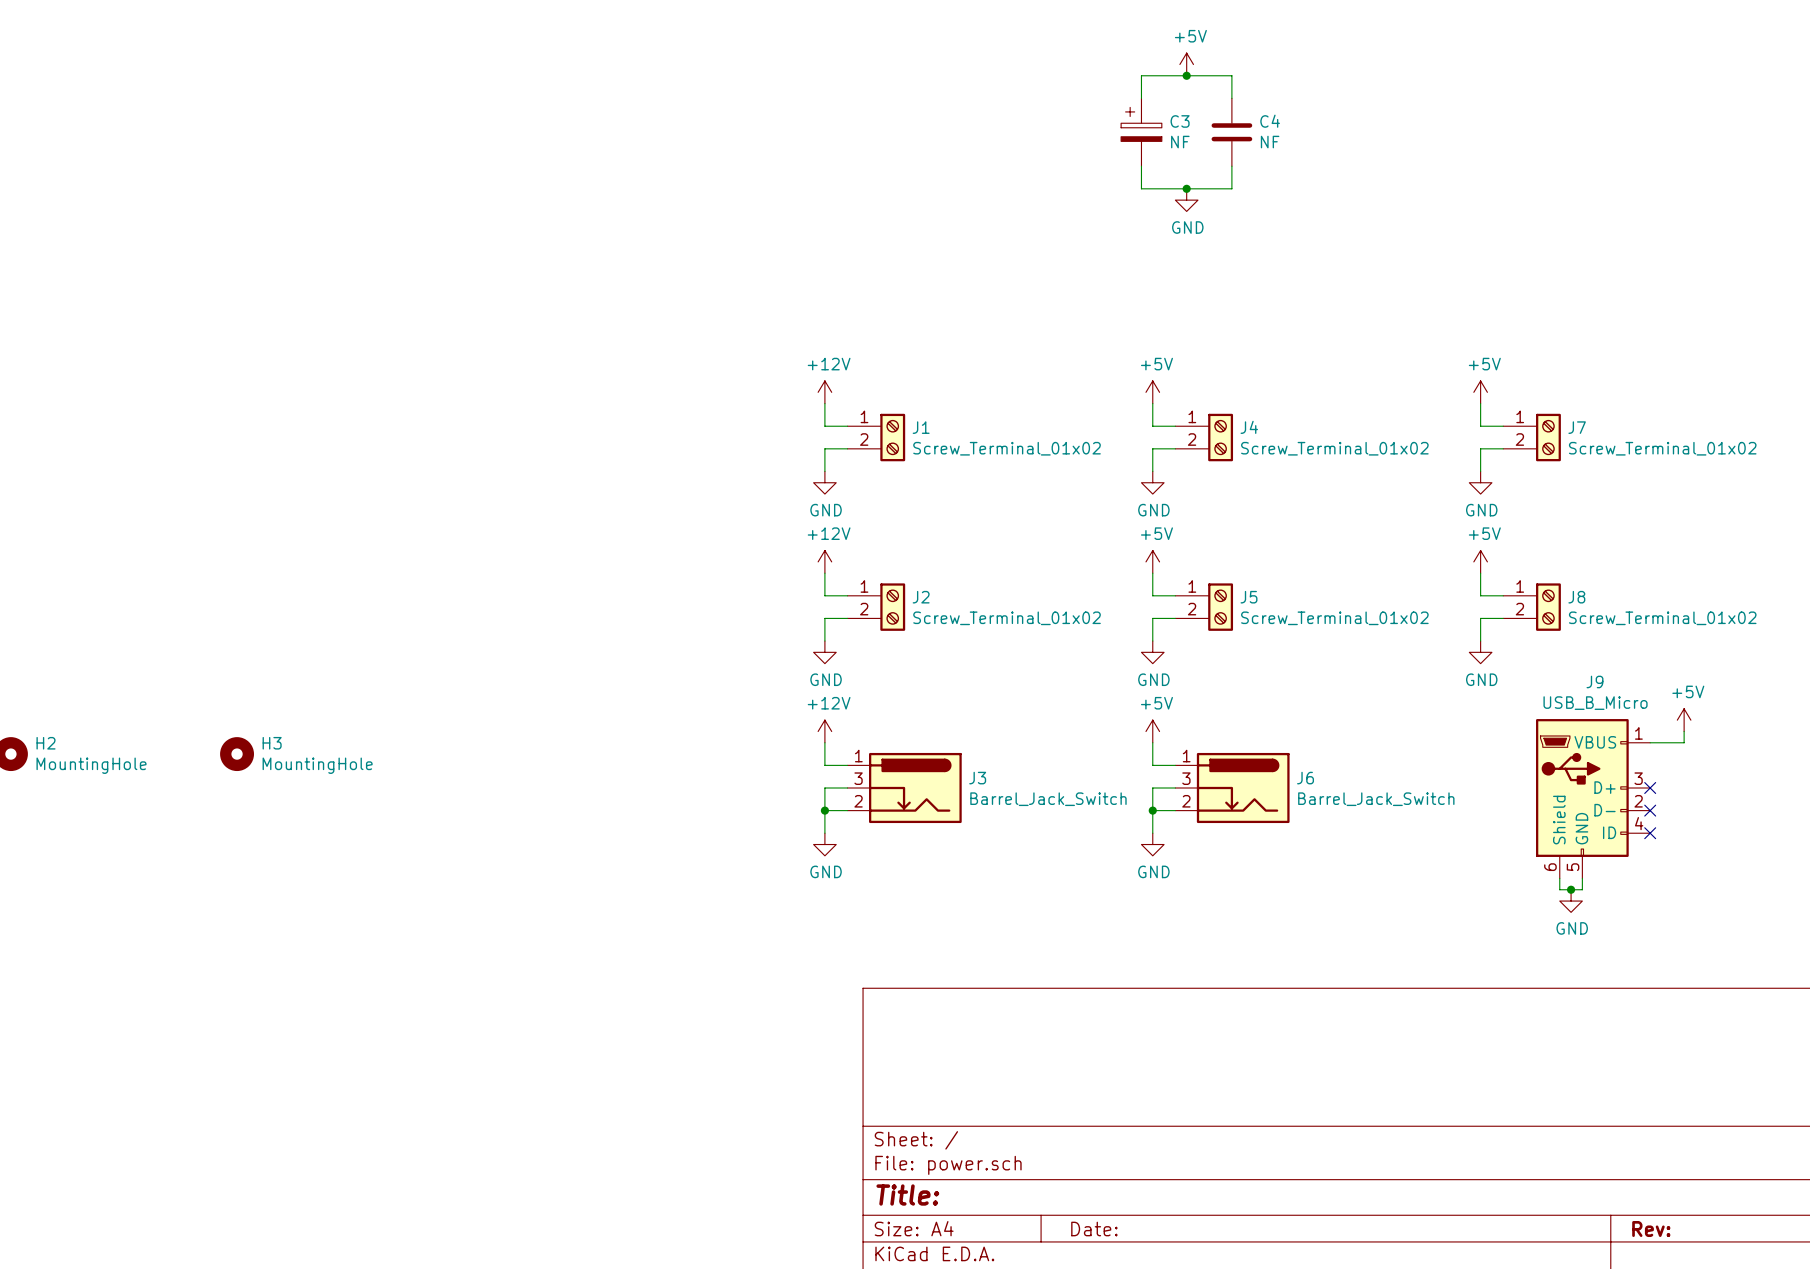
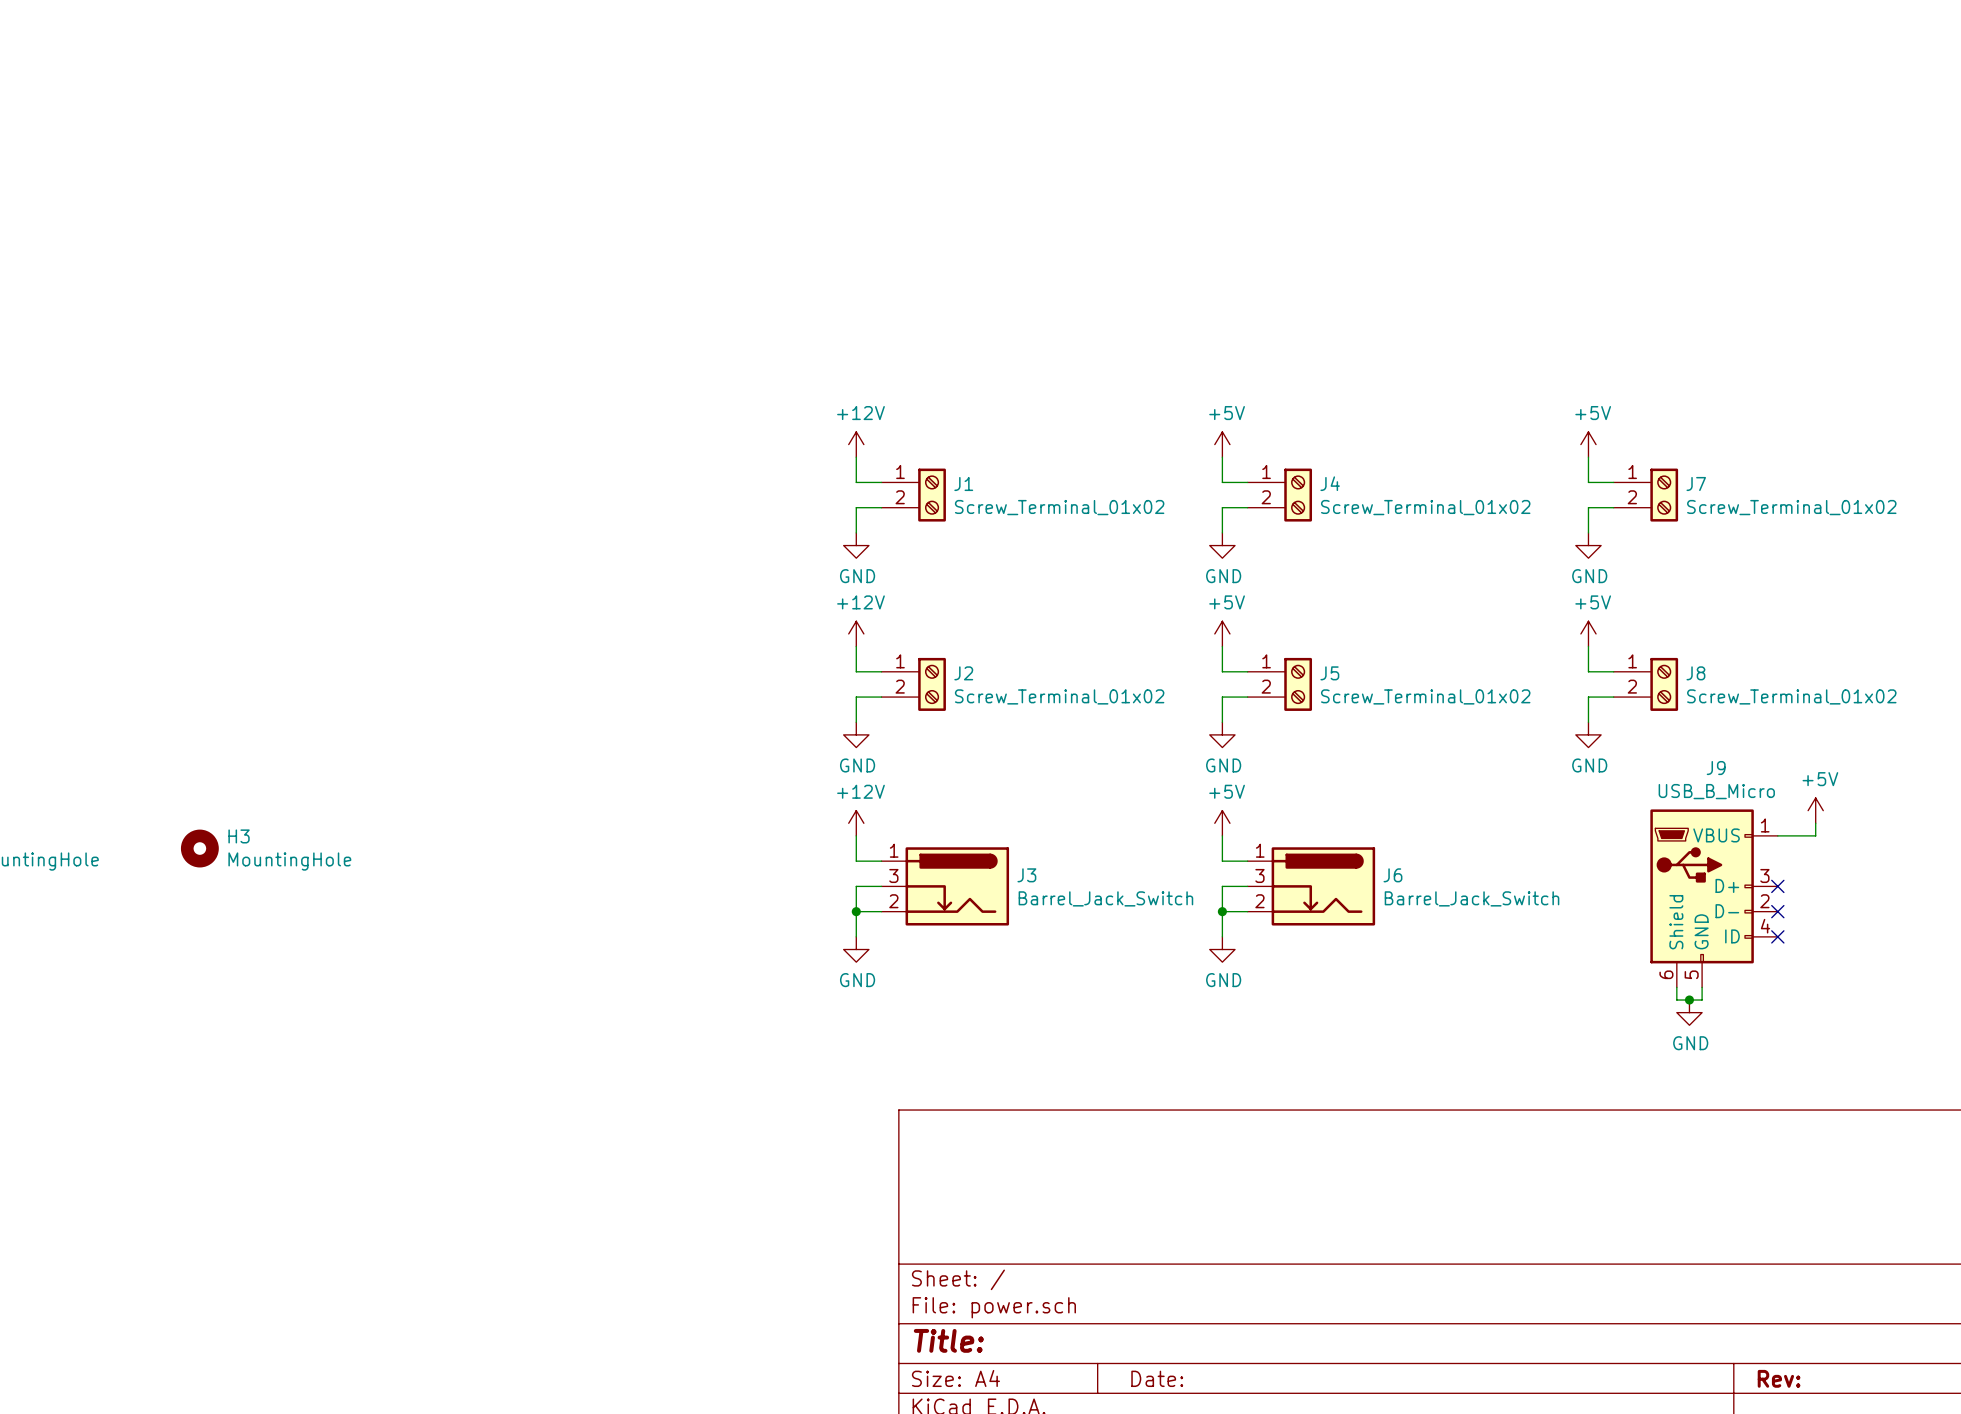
power symbol: +5V (1186, 64) -> none
junction: (1186, 75) -> none
wire: (1141, 98) (1141, 75) (1231, 75) (1231, 98) -> none
C3: NF (1141, 132) -> none
C4: NF (1231, 132) -> none
wire: (1141, 166) (1141, 188) (1231, 188) (1231, 166) -> none
junction: (1186, 188) -> none
power symbol: GND (1186, 200) -> none

